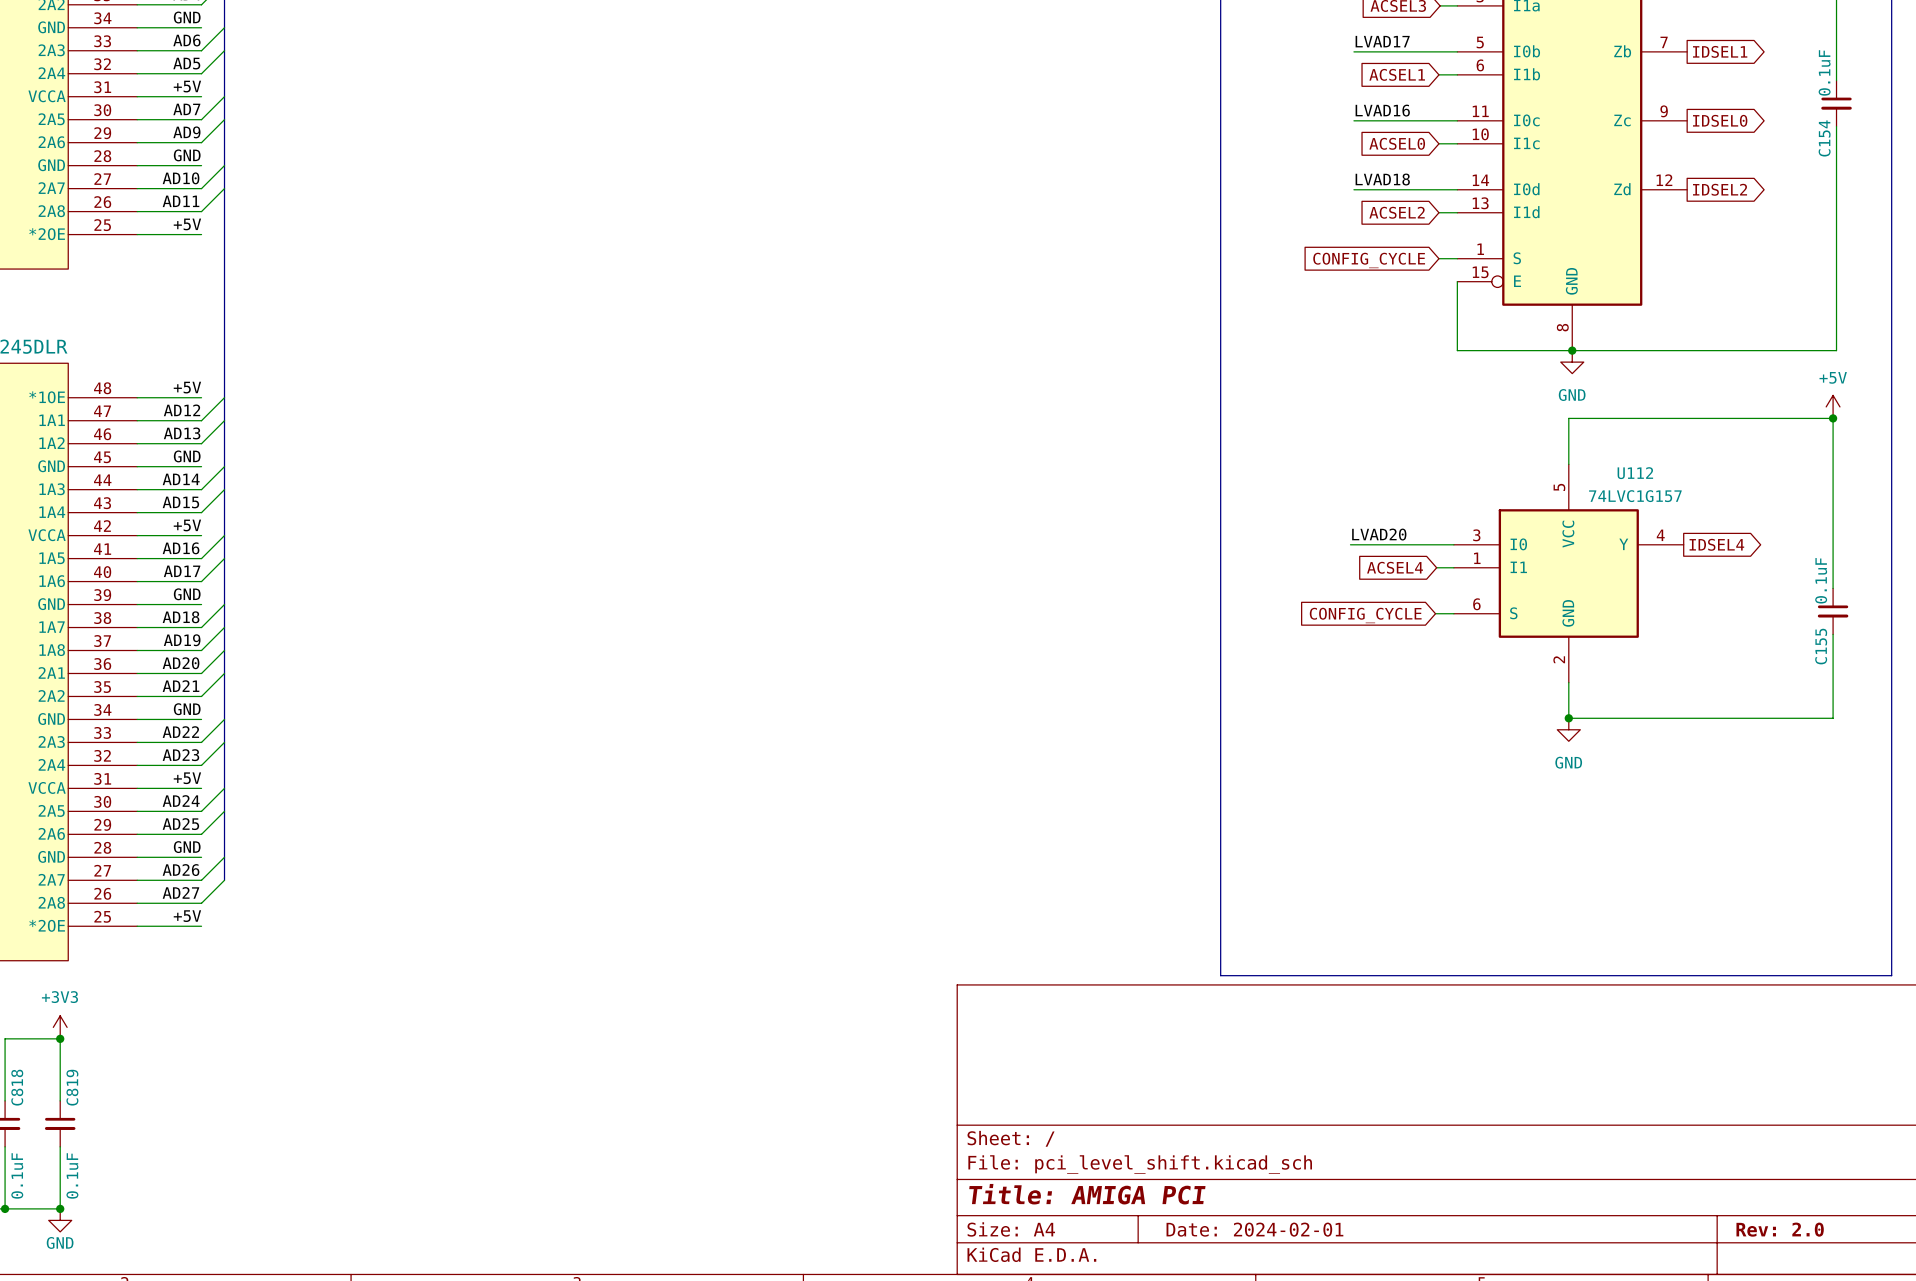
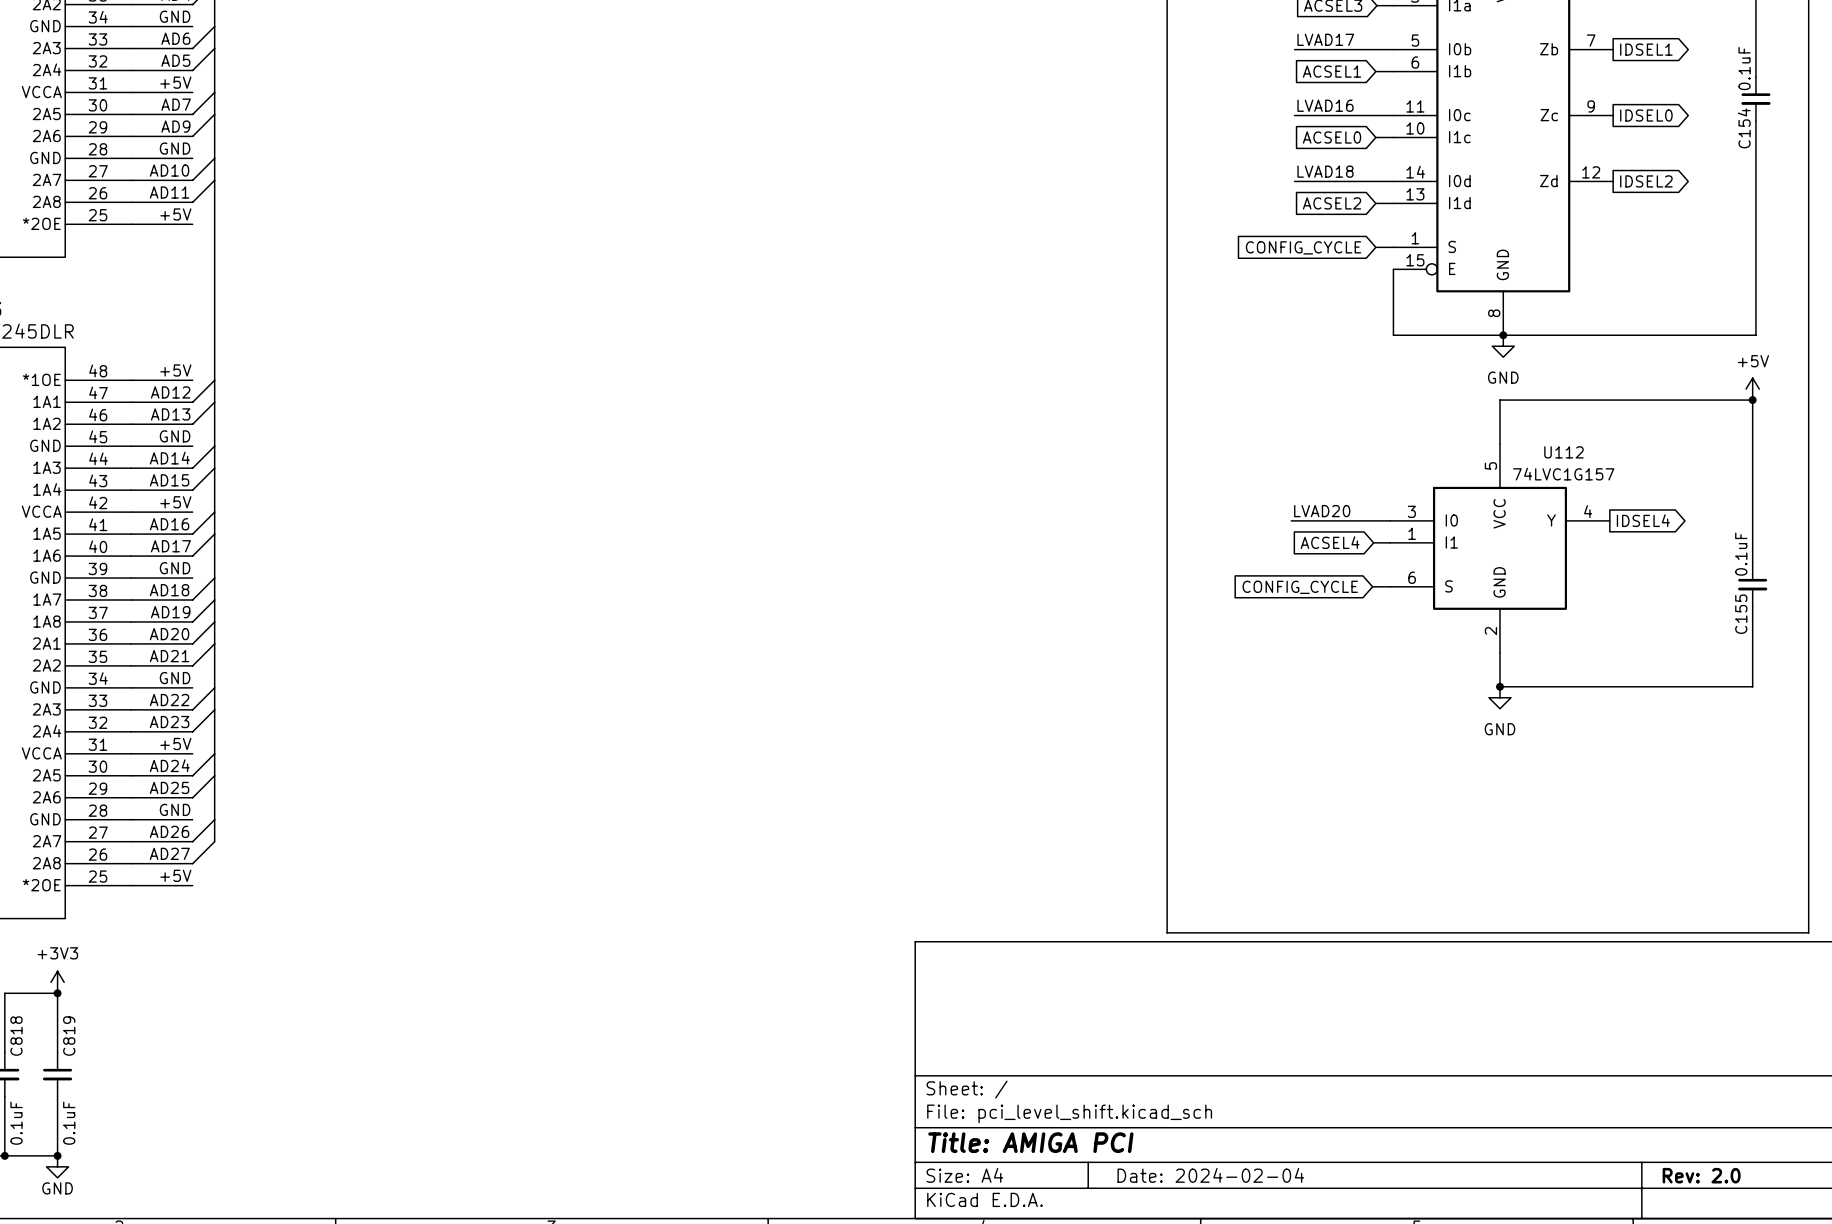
title block: Date: 2024-02-01 (1254, 1229) -> Date: 2024-02-04 (1210, 1175)

